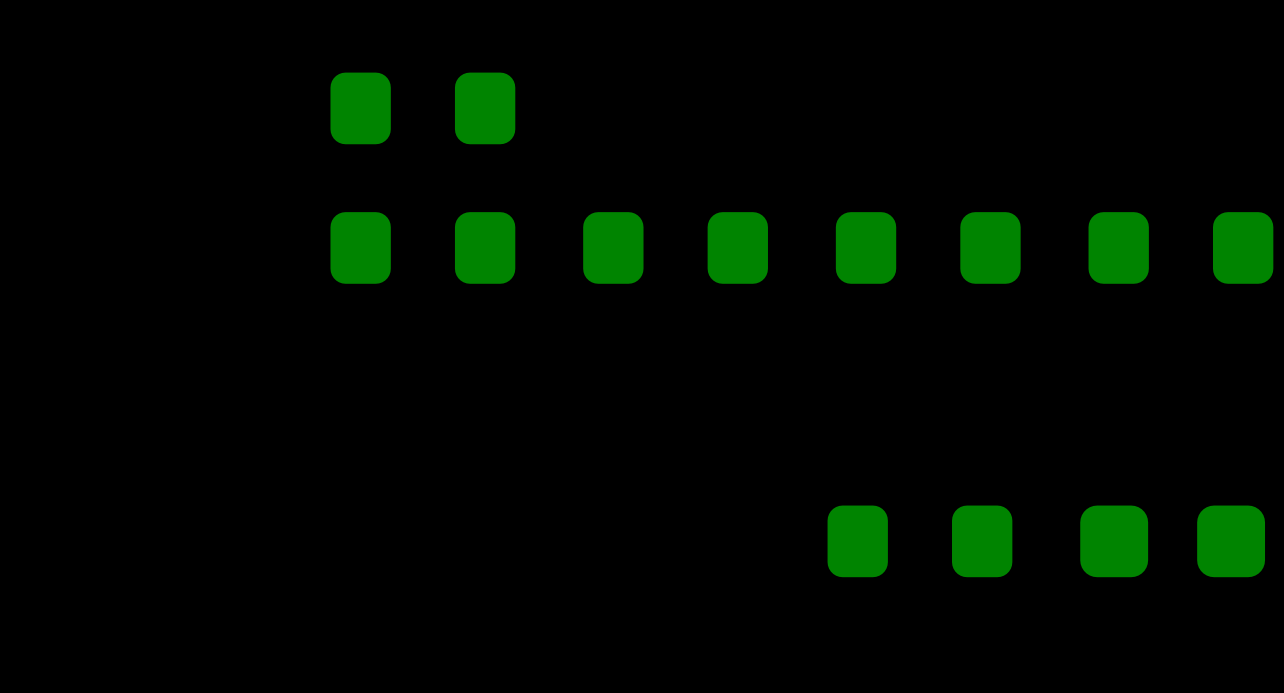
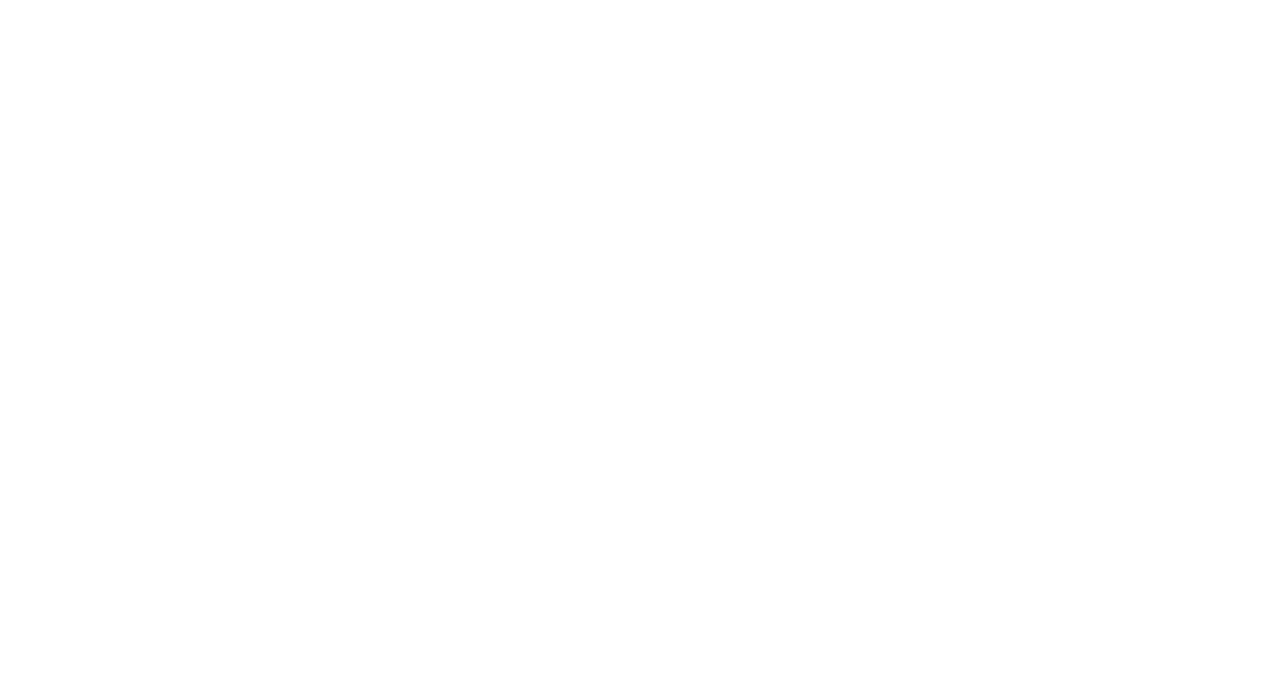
part: (422, 108) -> none
part: (422, 247) -> none
part: (675, 247) -> none
part: (928, 247) -> none
part: (1180, 247) -> none
part: (919, 541) -> none
part: (1172, 541) -> none

